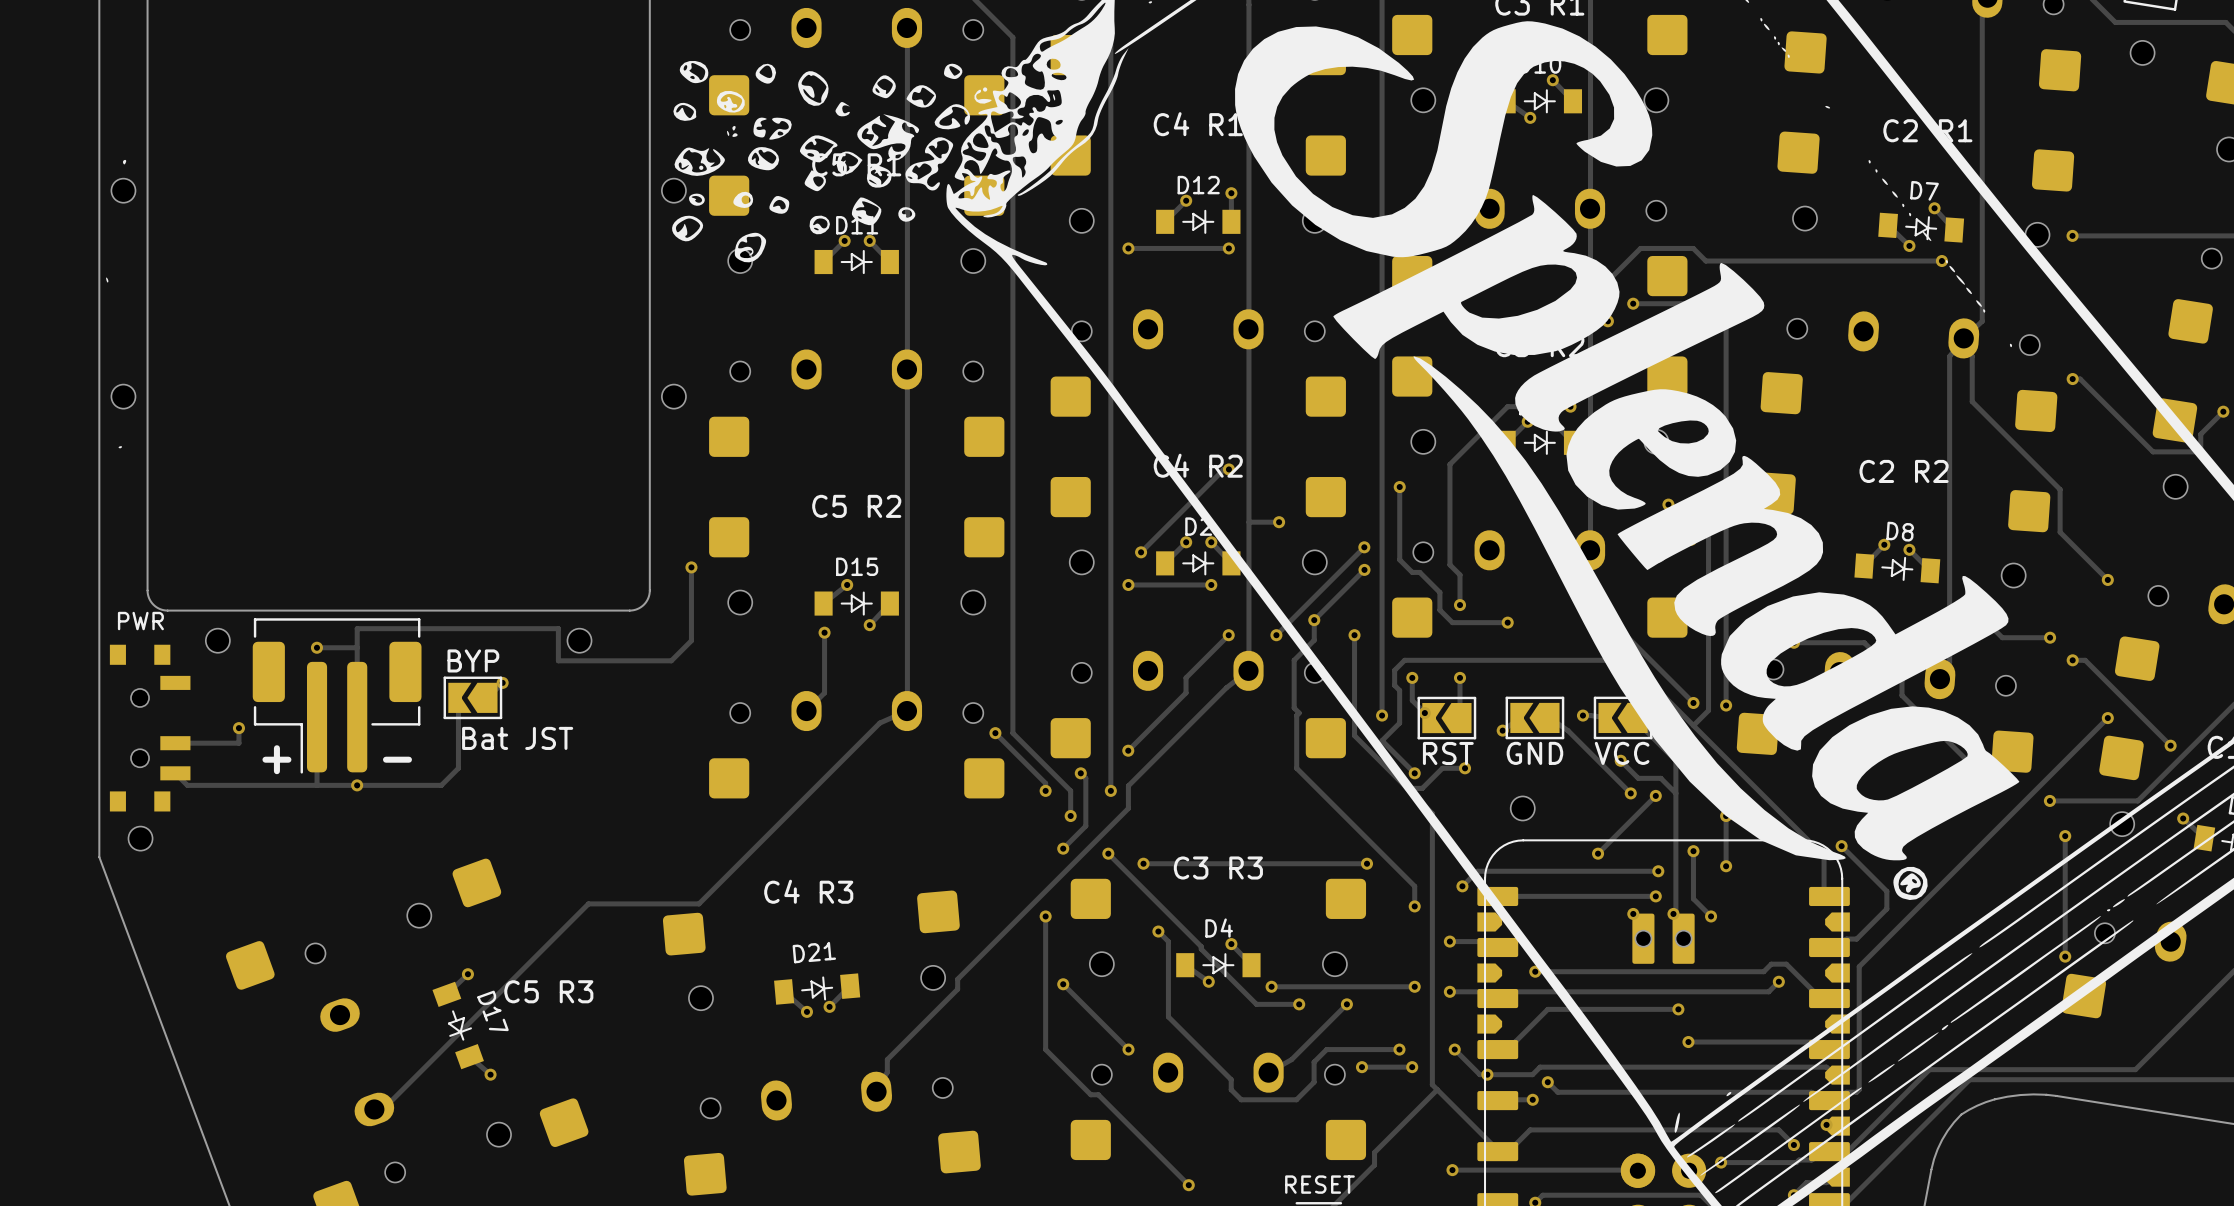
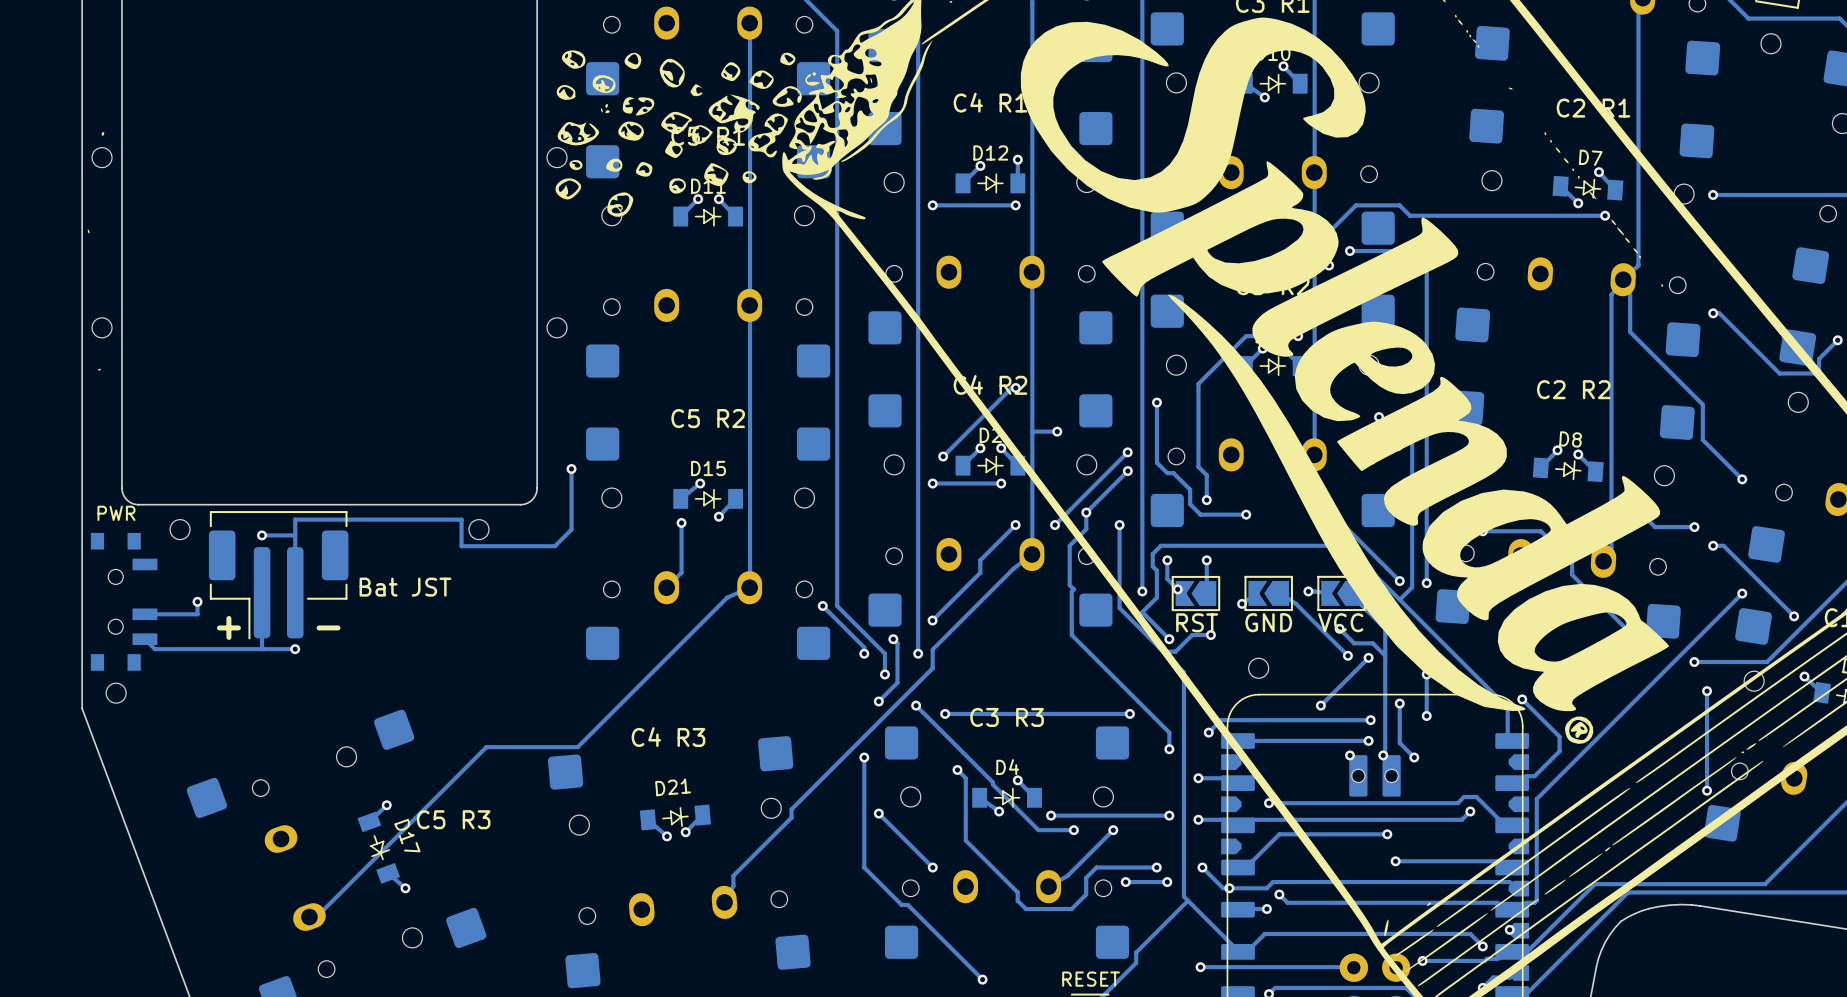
via: (502, 682) -> none
track: (458, 697) (458, 768) (441, 785) (357, 785) -> none
BYP: (472, 697) -> none
Bat JST name position: Bat JST (517, 738) -> Bat JST (405, 587)

